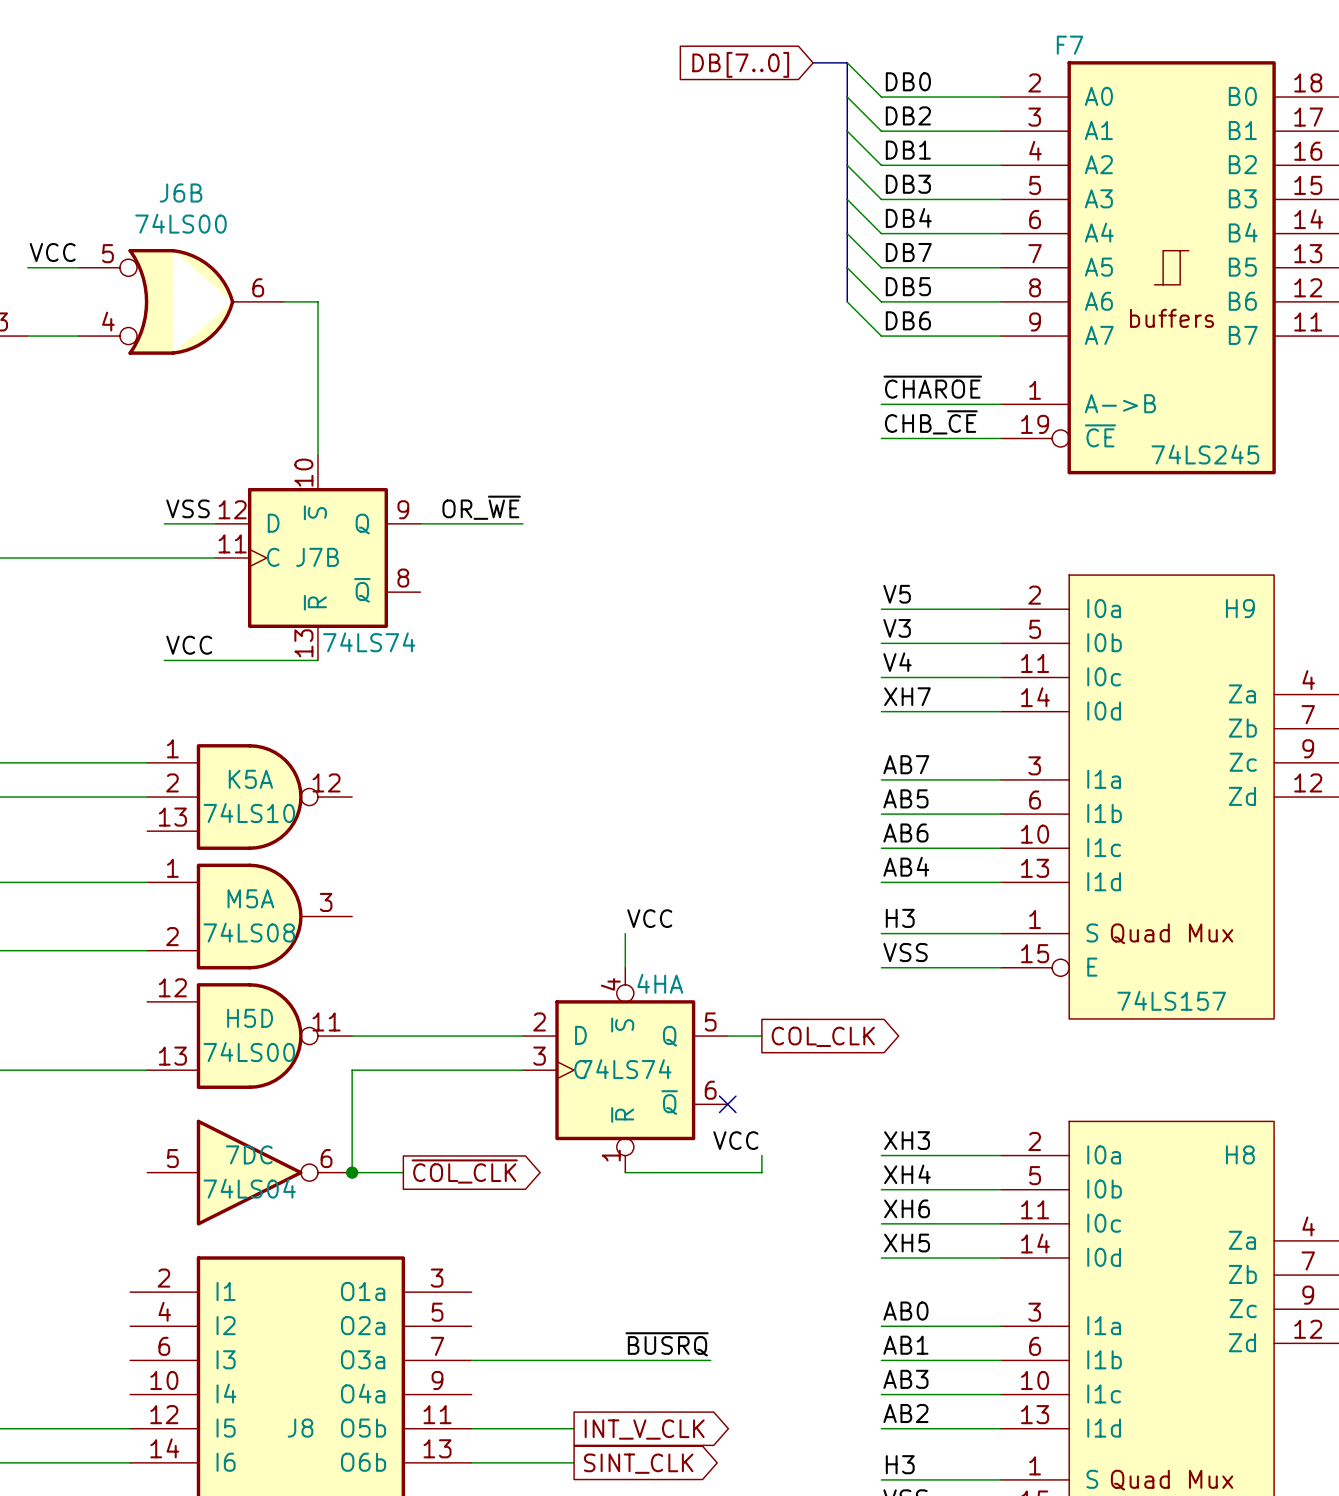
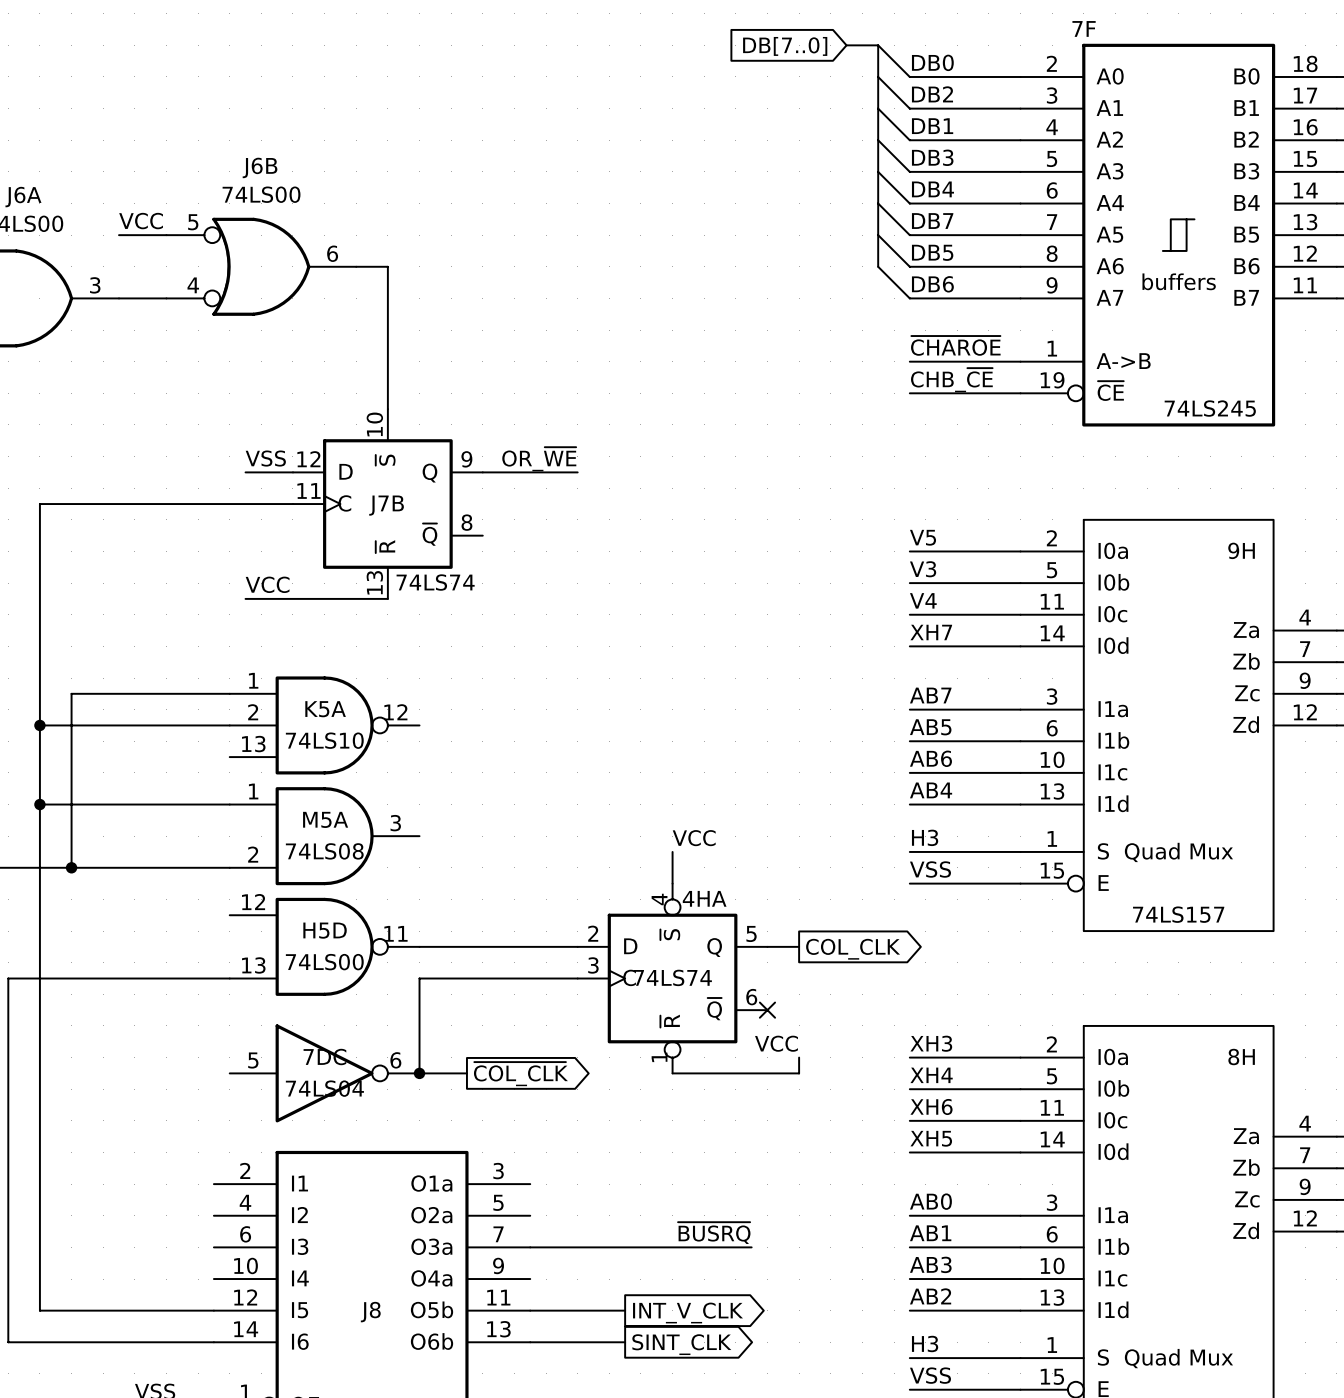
F7 name: F7 (1070, 45) -> 7F (1084, 28)
H9 name: H9 (1240, 608) -> 9H (1241, 550)
H8 name: H8 (1240, 1154) -> 8H (1241, 1057)

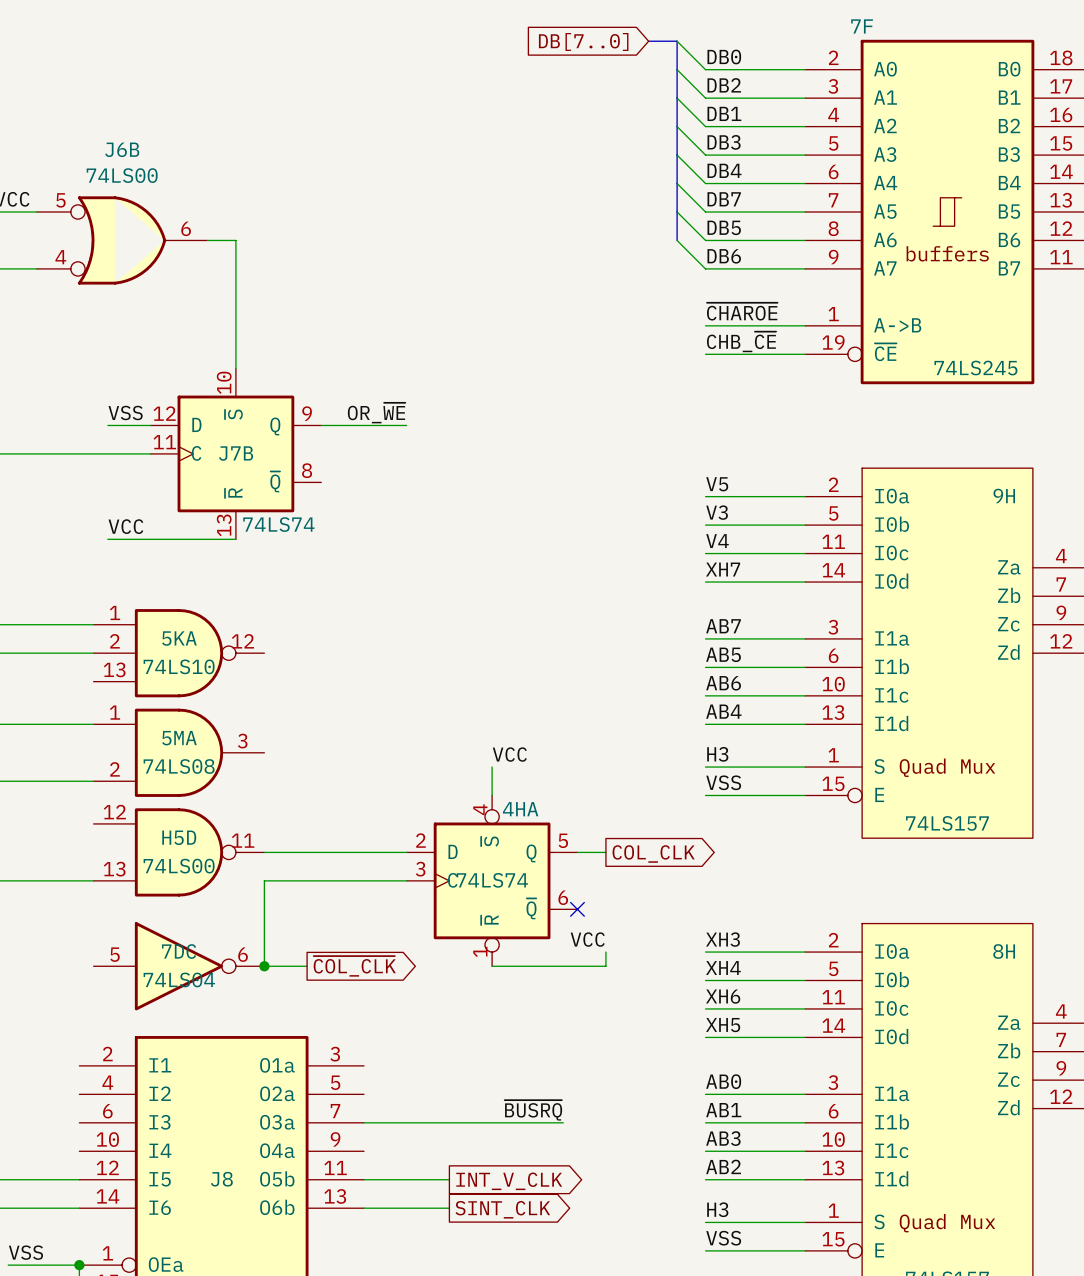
K5A name: K5A (325, 709) -> 5KA (179, 638)
M5A name: M5A (325, 819) -> 5MA (179, 738)

